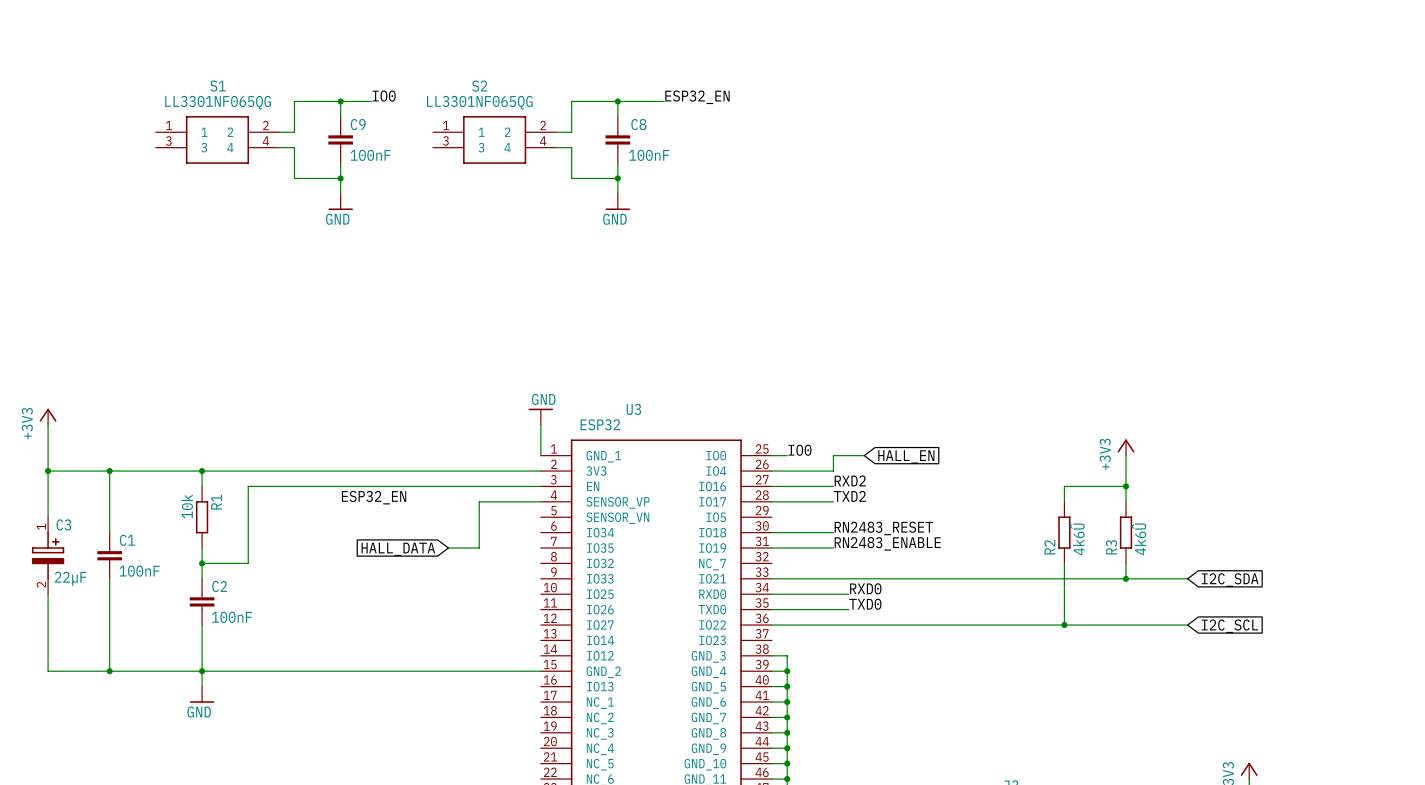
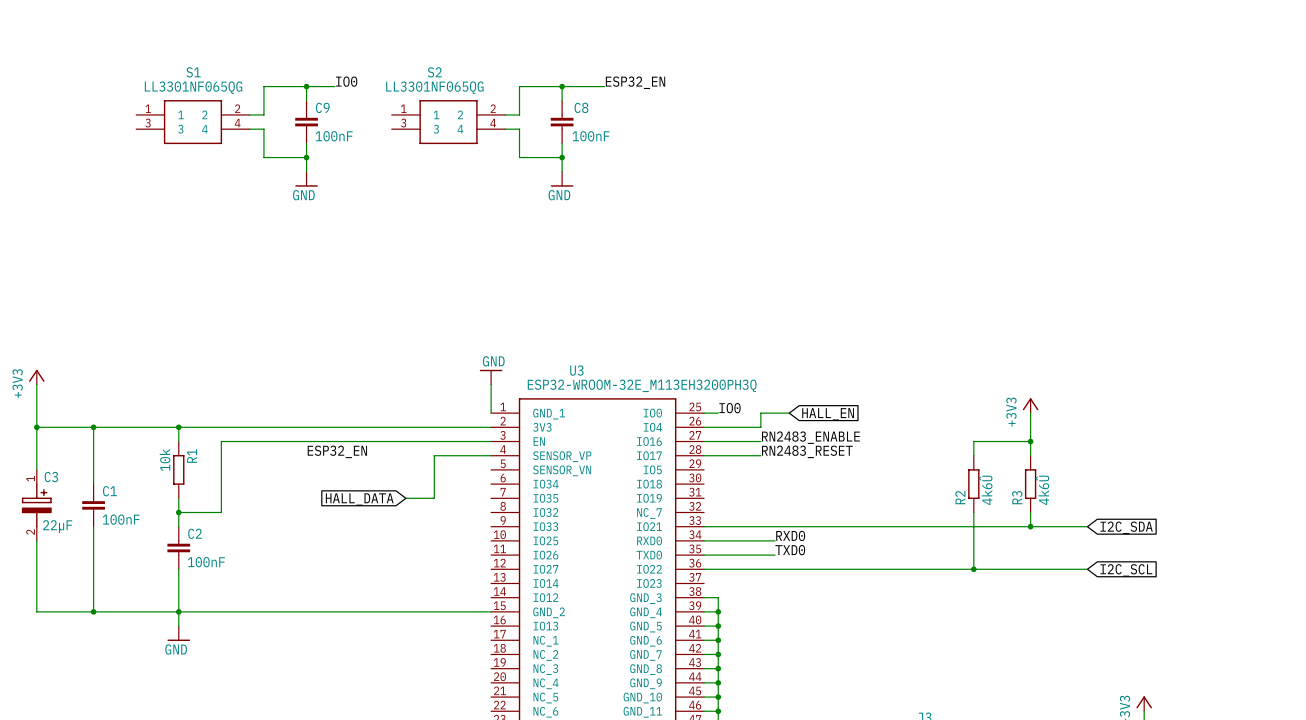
U3 value: ESP32 (600, 424) -> ESP32-WROOM-32E_M113EH3200PH3Q (642, 385)
label: RXD2 (850, 480) -> RN2483_ENABLE (810, 437)
label: TXD2 (849, 496) -> RN2483_RESET (807, 451)
label: RN2483_RESET (883, 528) -> none
wire: (771, 532) (833, 532) -> none
label: RN2483_ENABLE (887, 543) -> none
wire: (771, 548) (833, 548) -> none

